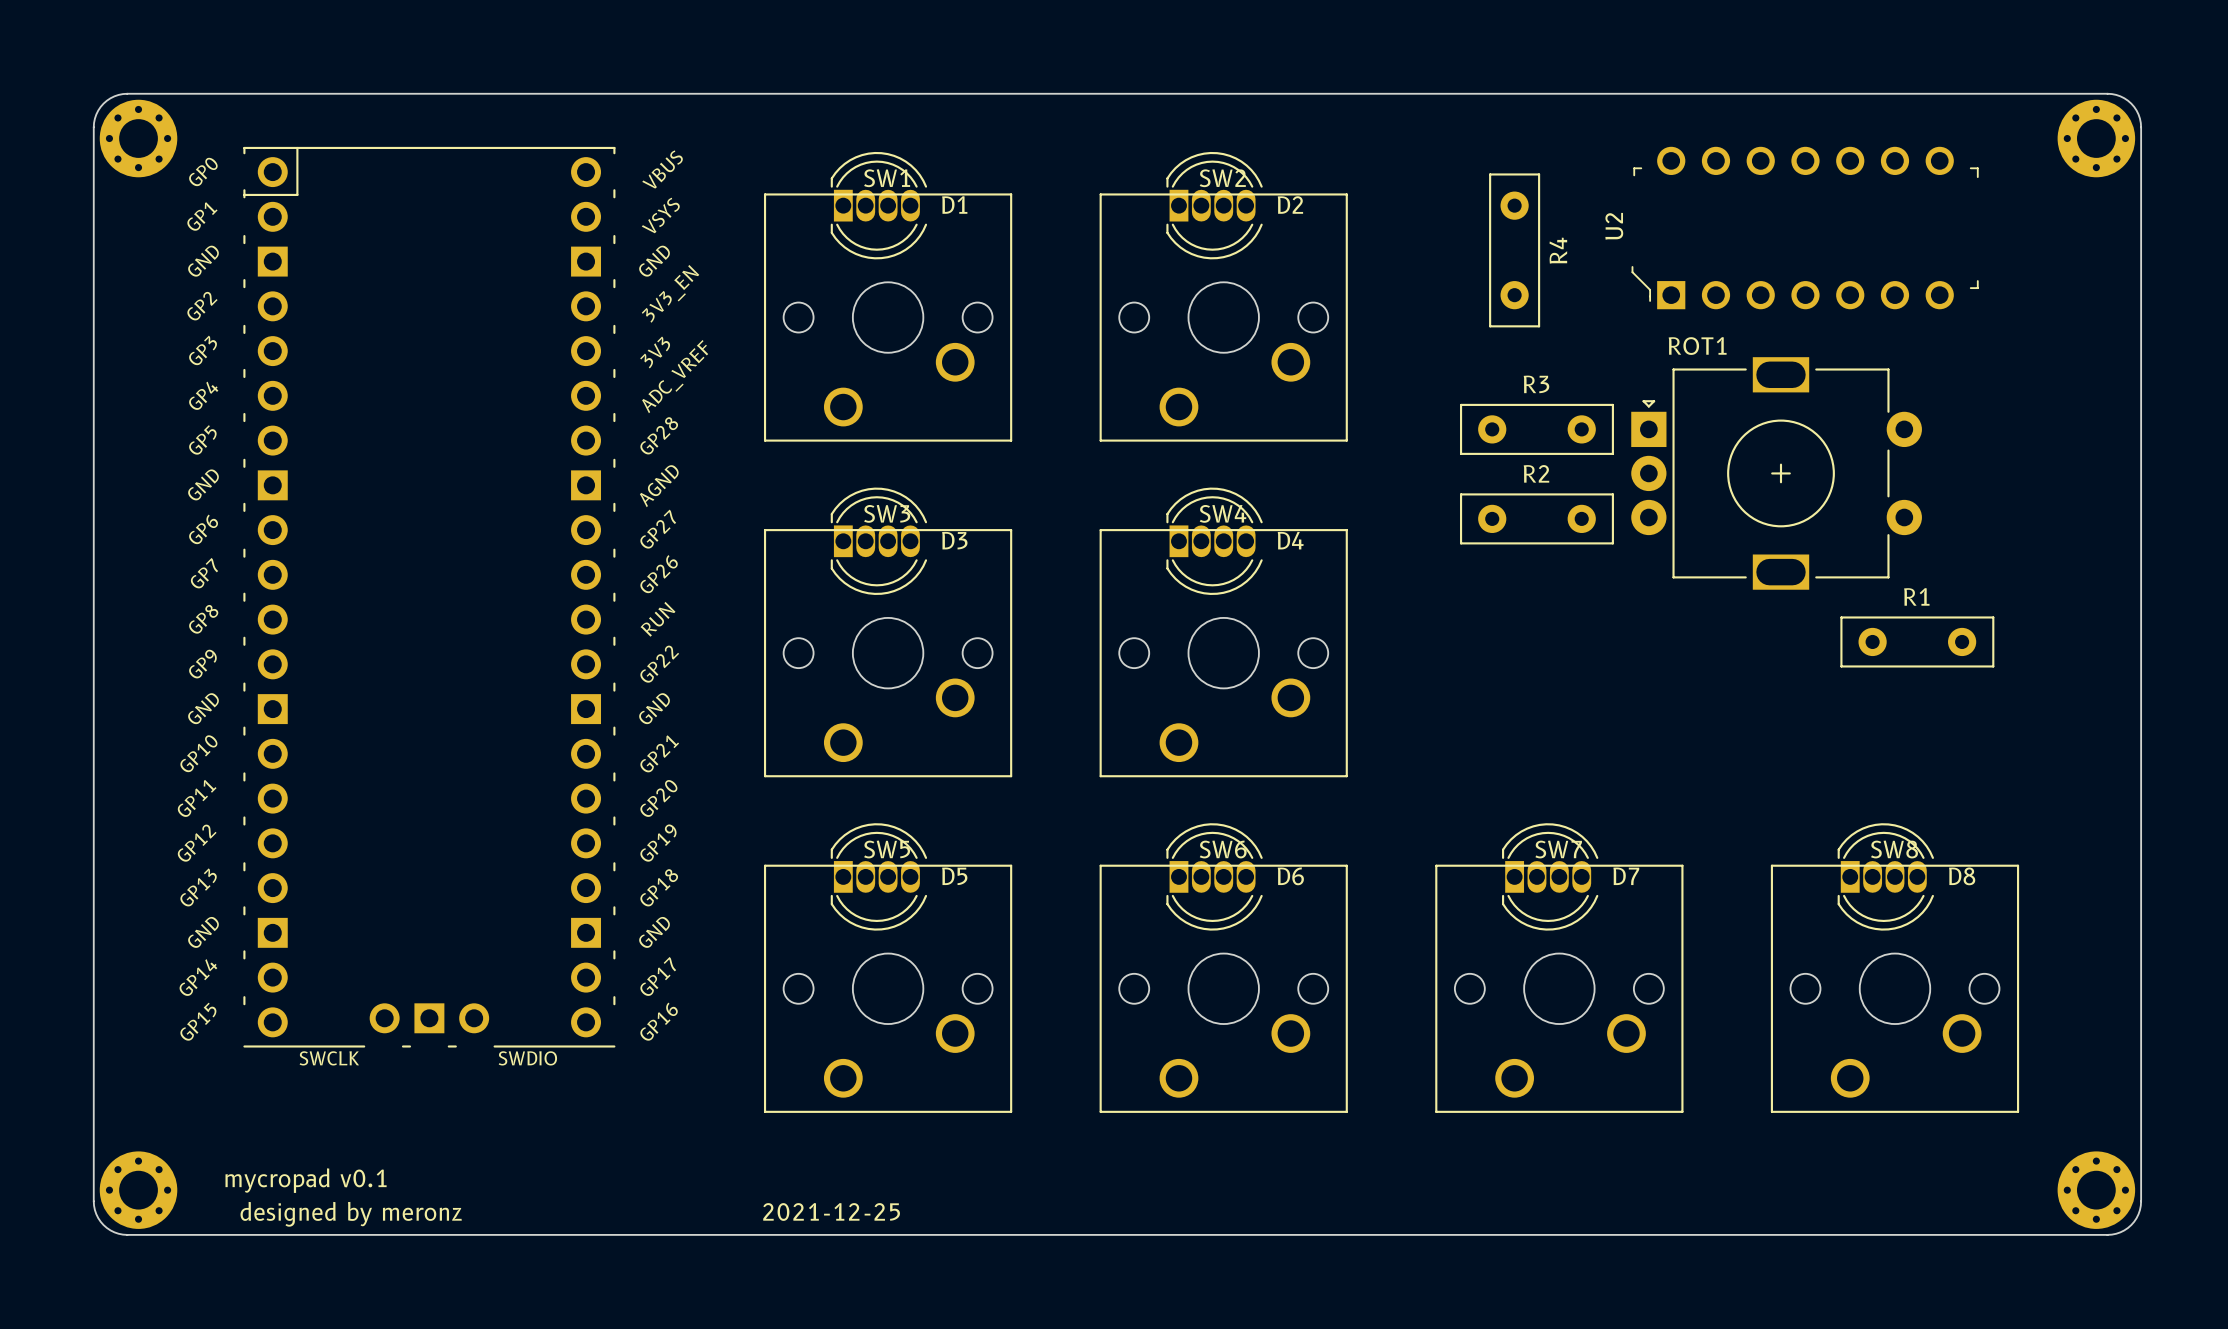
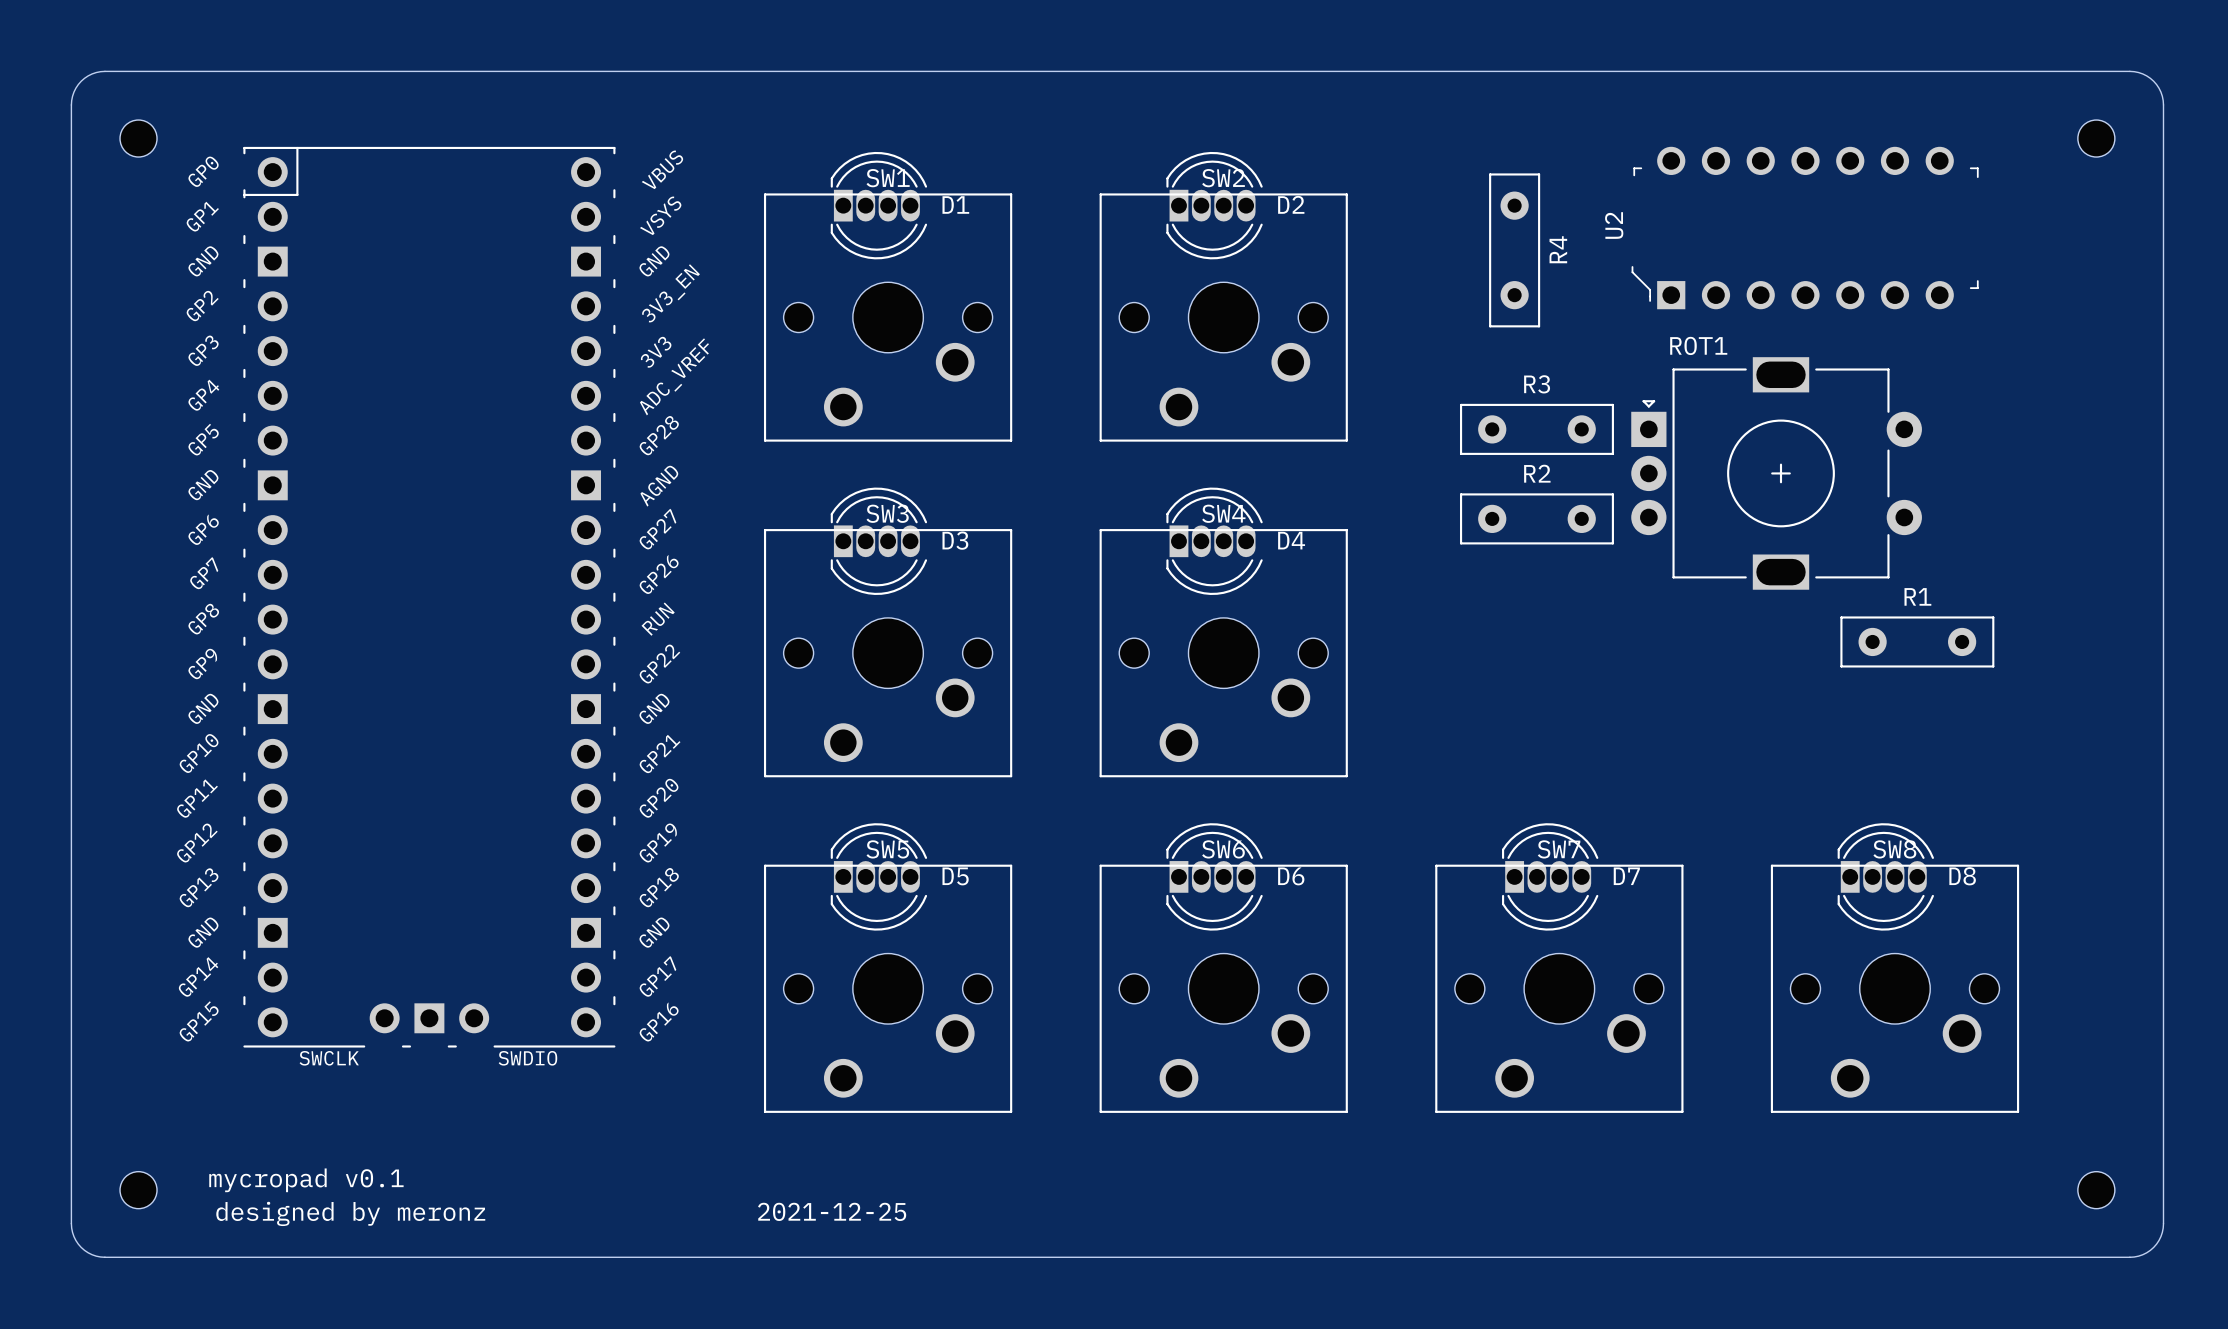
board edge: (127, 93) (2107, 93) (2124, 98) (2136, 110) (2141, 127) (2141, 1201) (2136, 1218) (2124, 1230) (2107, 1234) (127, 1234) (110, 1230) (98, 1218) (93, 1201) (93, 127) (96, 114) (103, 103) (114, 96) (127, 93) -> (104, 71) (92, 73) (81, 81) (73, 92) (71, 104) (71, 1223) (75, 1240) (88, 1252) (104, 1257) (2129, 1257) (2146, 1252) (2158, 1240) (2163, 1223) (2163, 104) (2158, 88) (2146, 75) (2129, 71) (104, 71)
part footprint: [99, 99, 178, 178] -> [120, 120, 158, 158]
part footprint: [2057, 99, 2136, 178] -> [2077, 120, 2115, 158]
part footprint: [99, 1151, 178, 1229] -> [120, 1171, 158, 1209]
part footprint: [2057, 1151, 2136, 1229] -> [2077, 1171, 2115, 1209]

